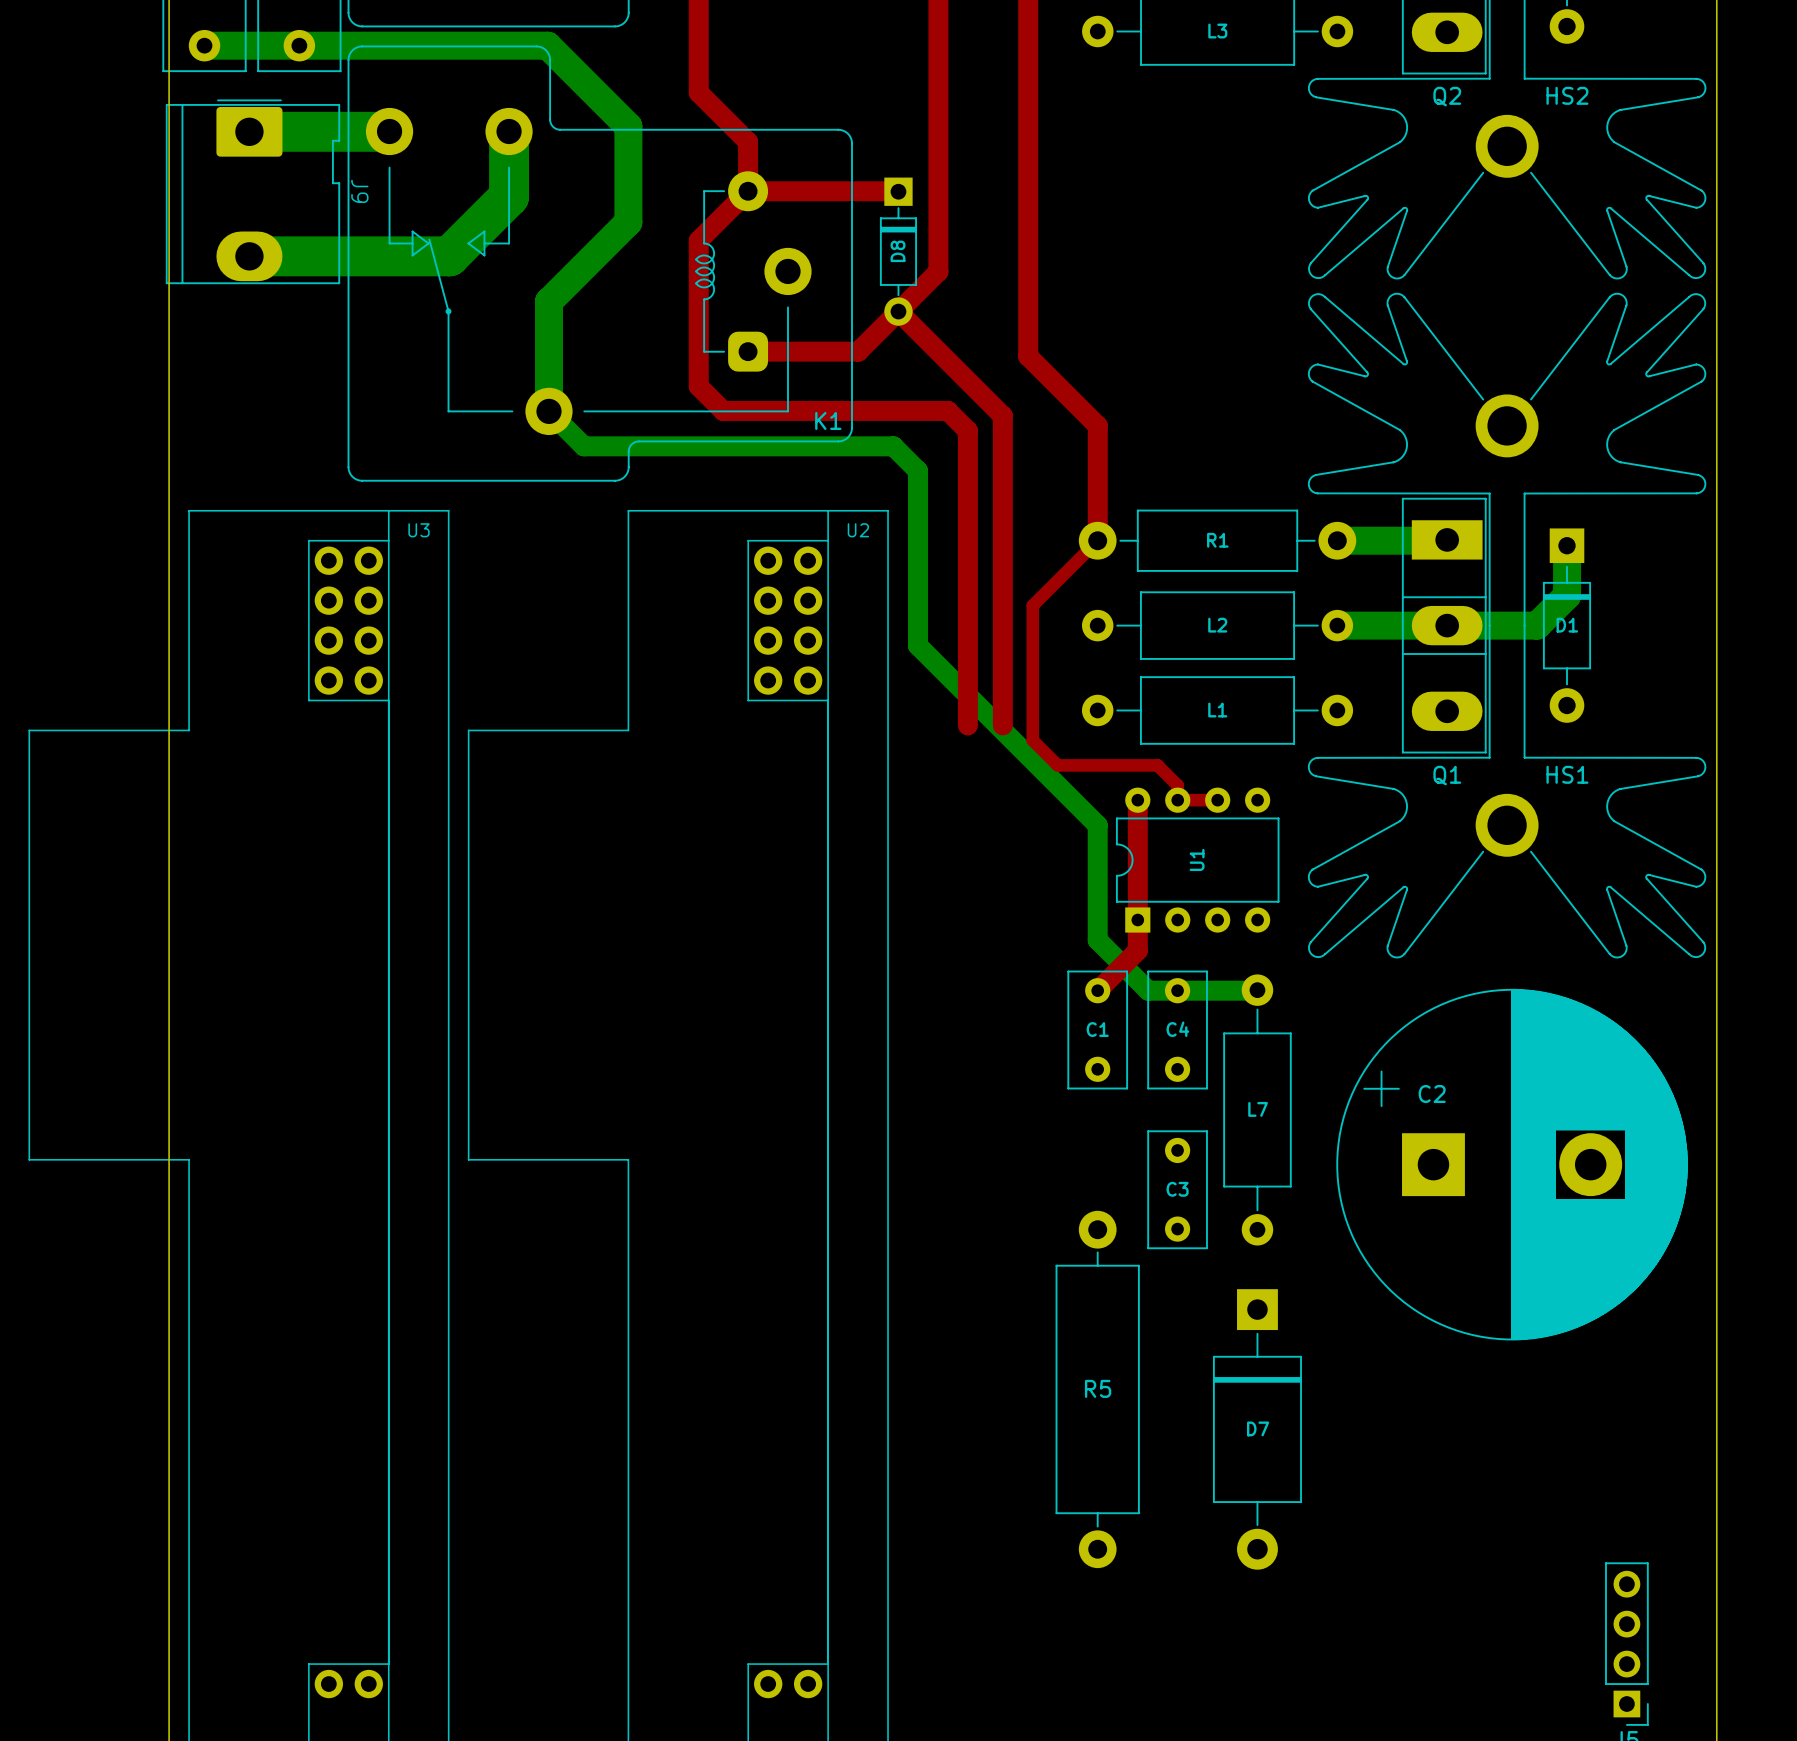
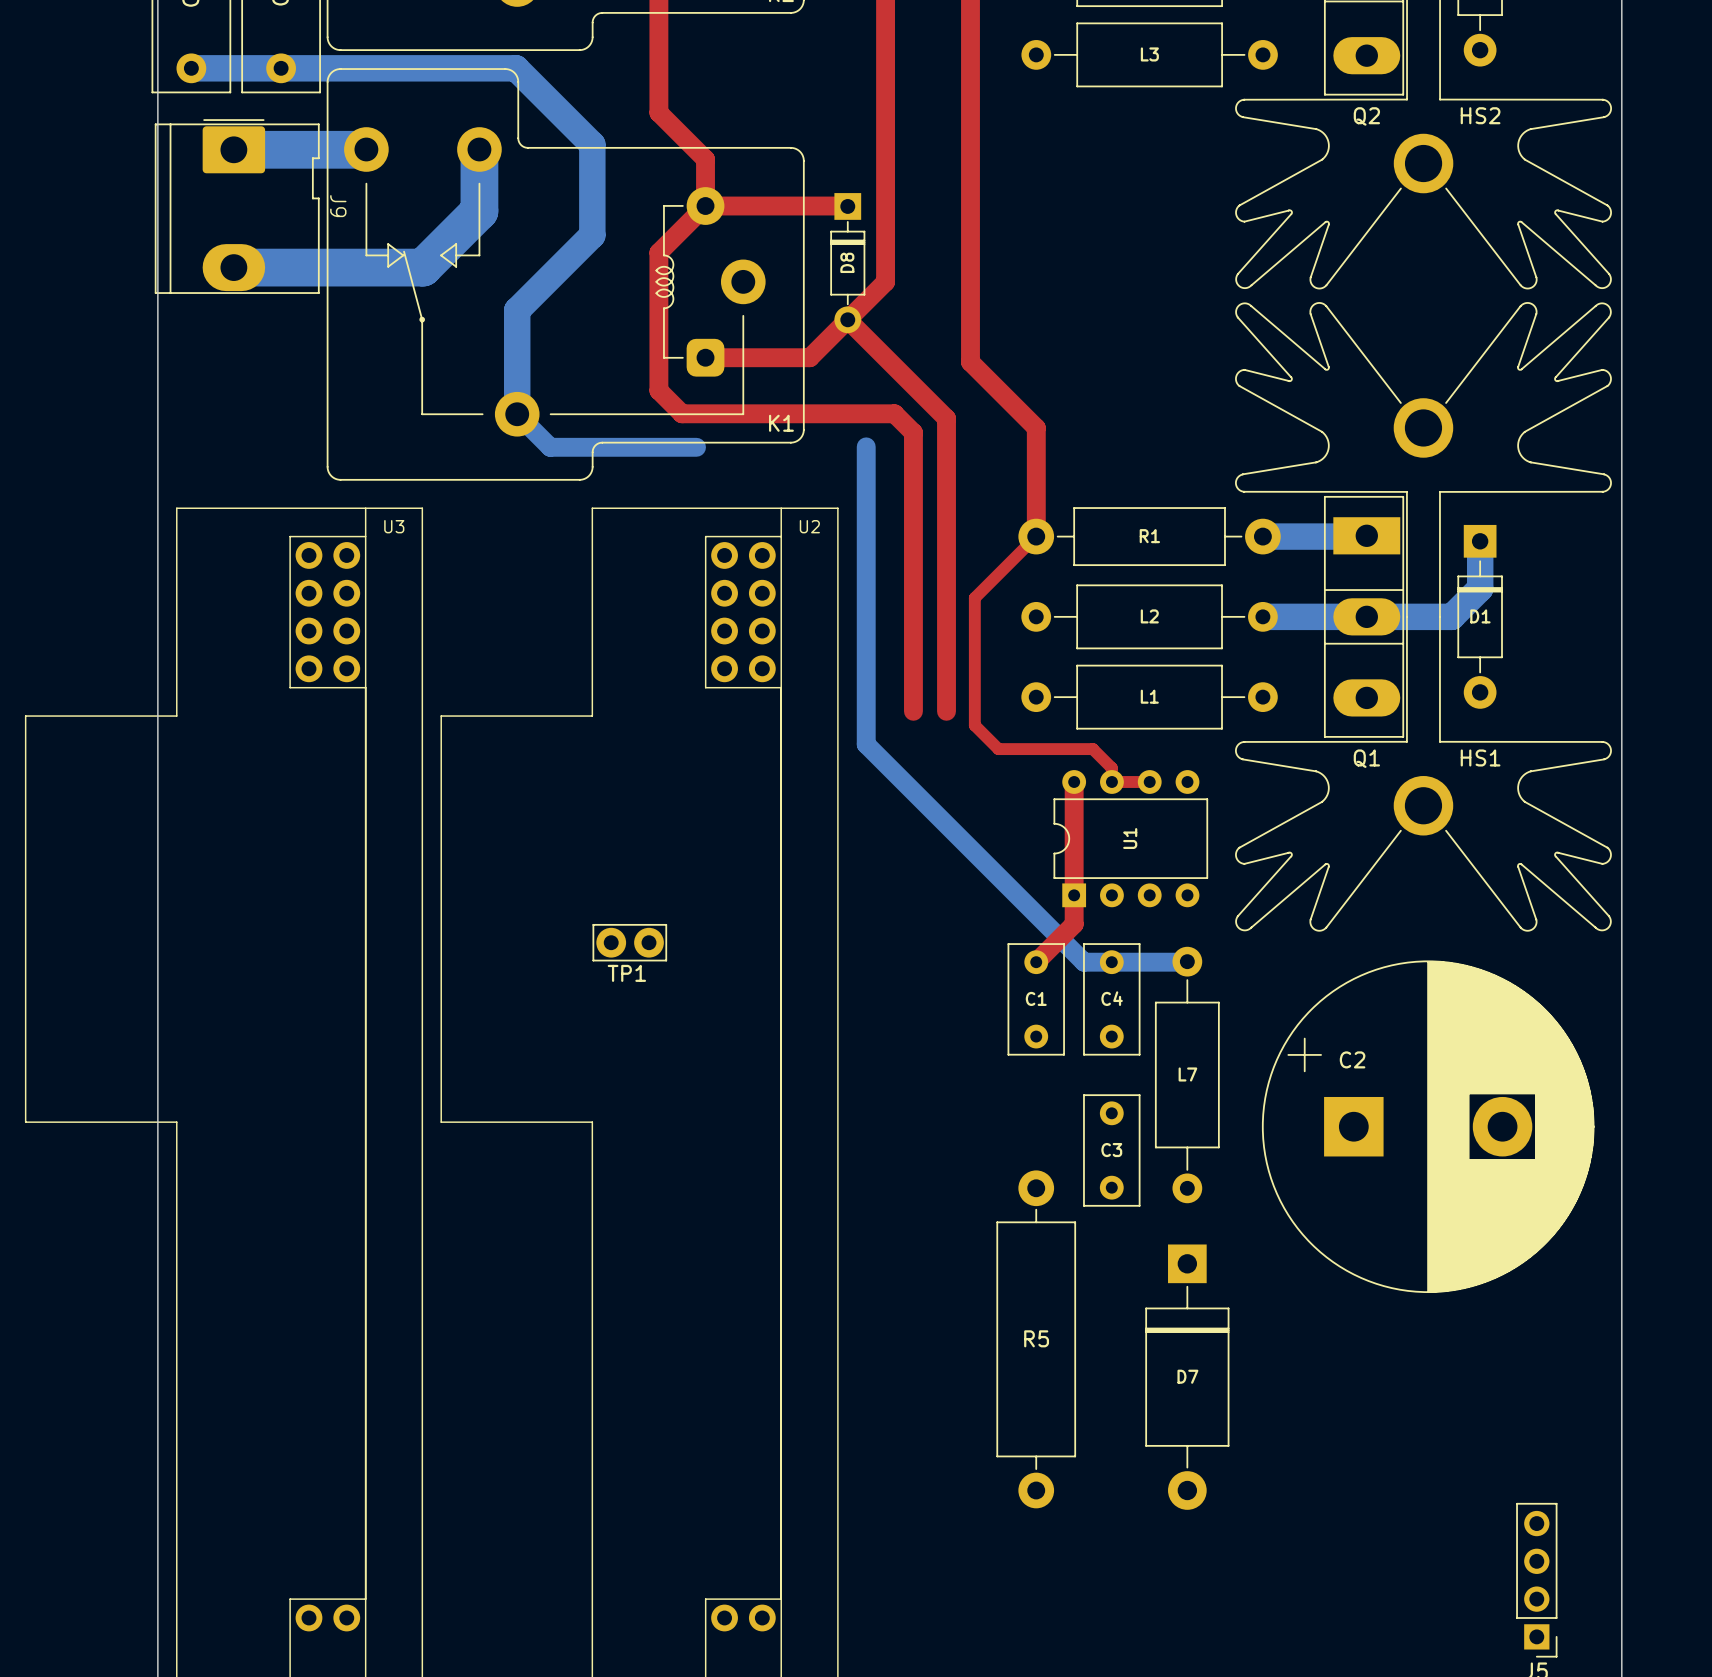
bottom track: (738, 446) (893, 446) (917, 470) -> (866, 446) (866, 470)
bottom track: (917, 645) (1097, 825) (1097, 940) -> (866, 635) (866, 744) (1036, 914)
TP1: none -> (629, 942)

